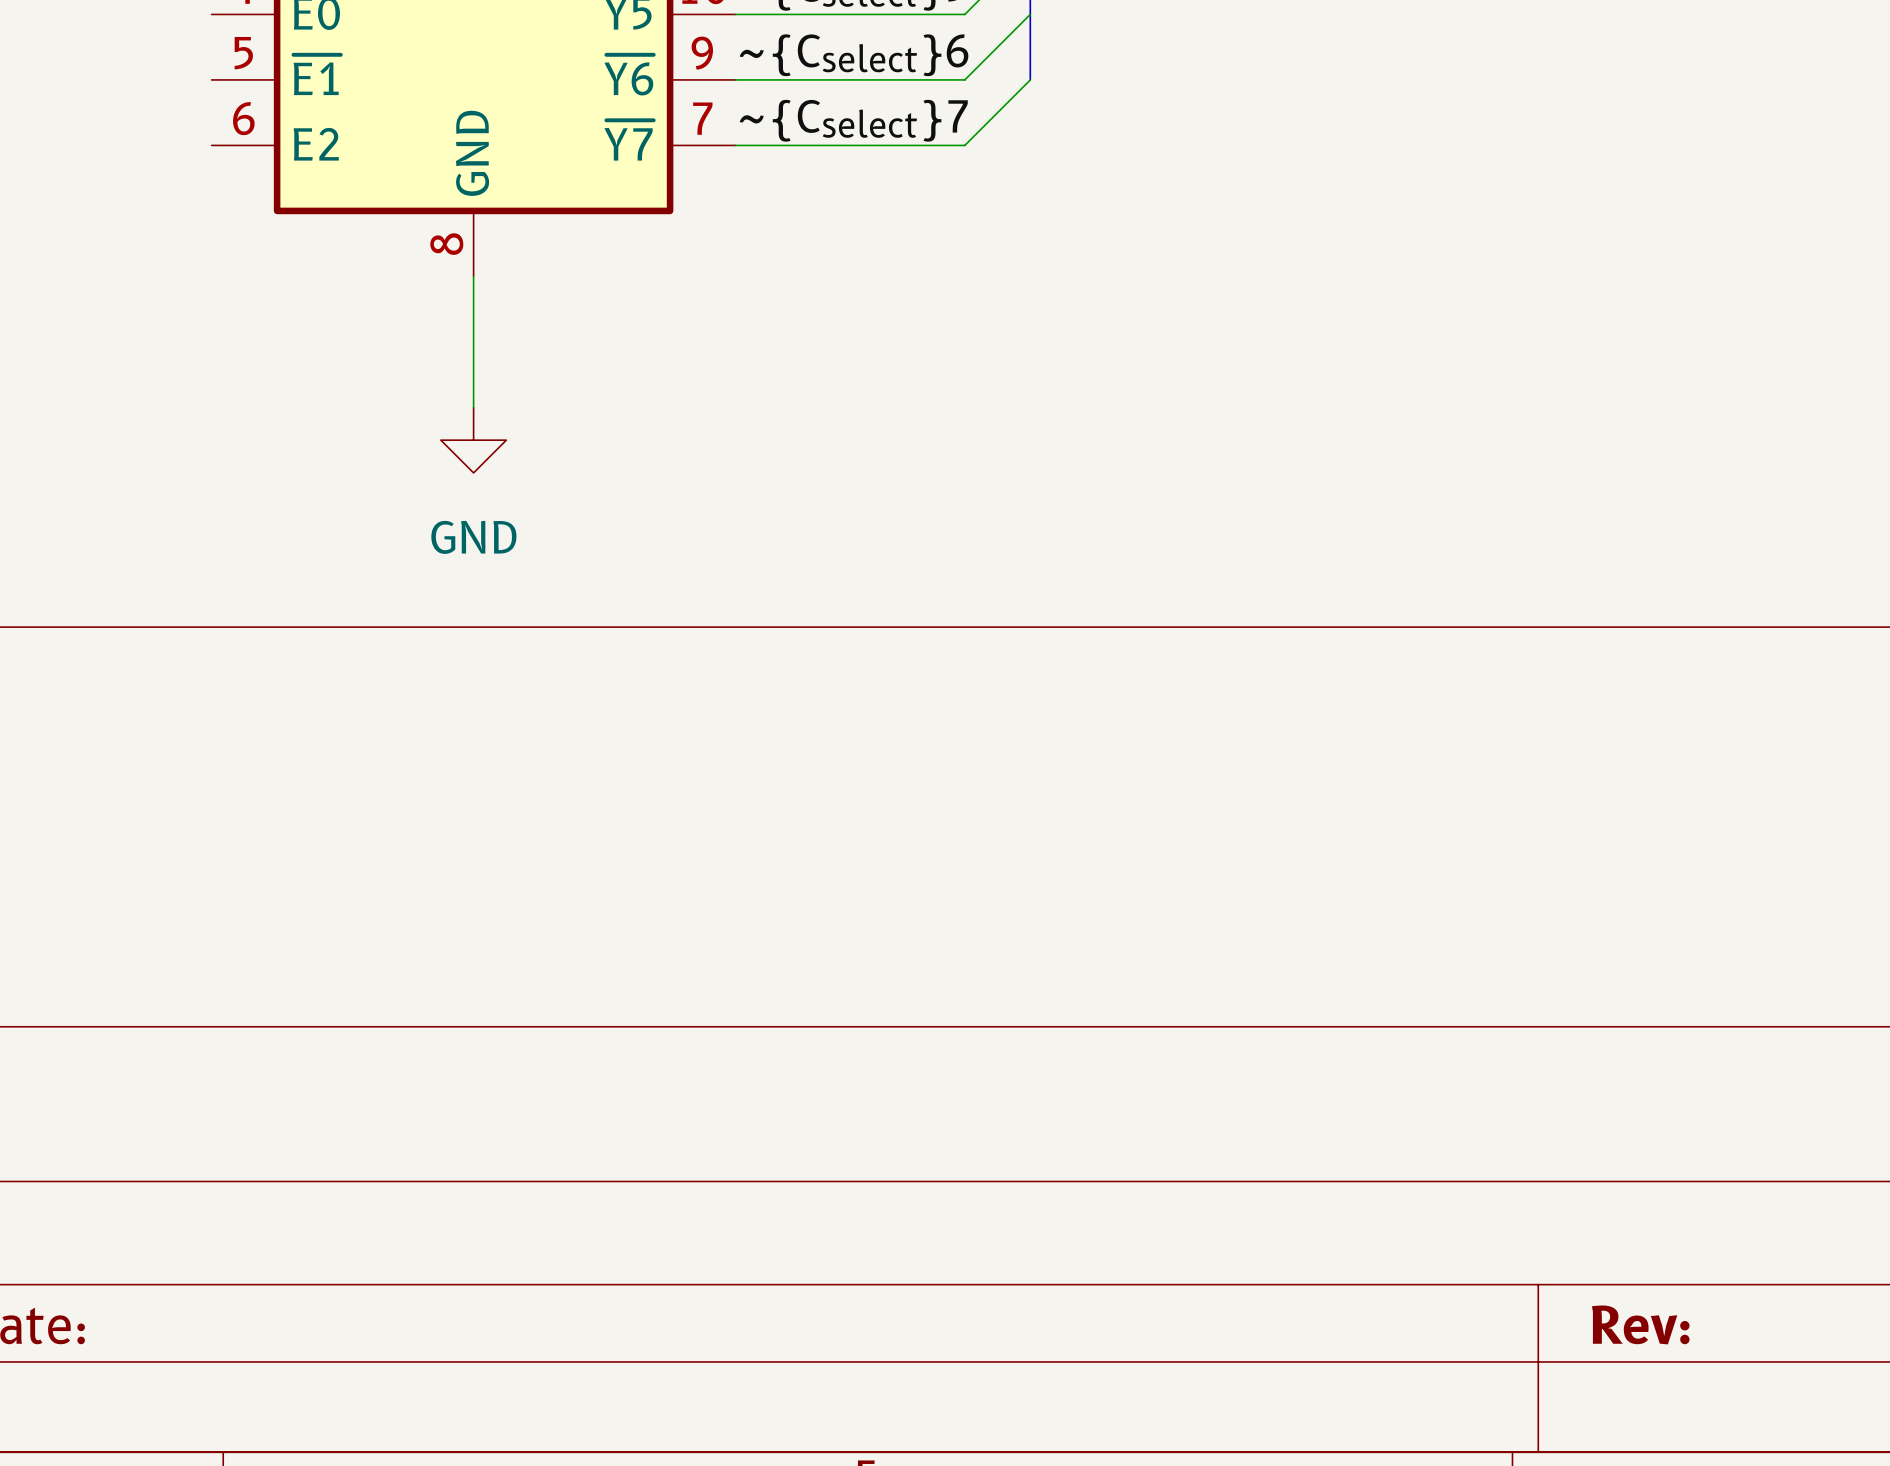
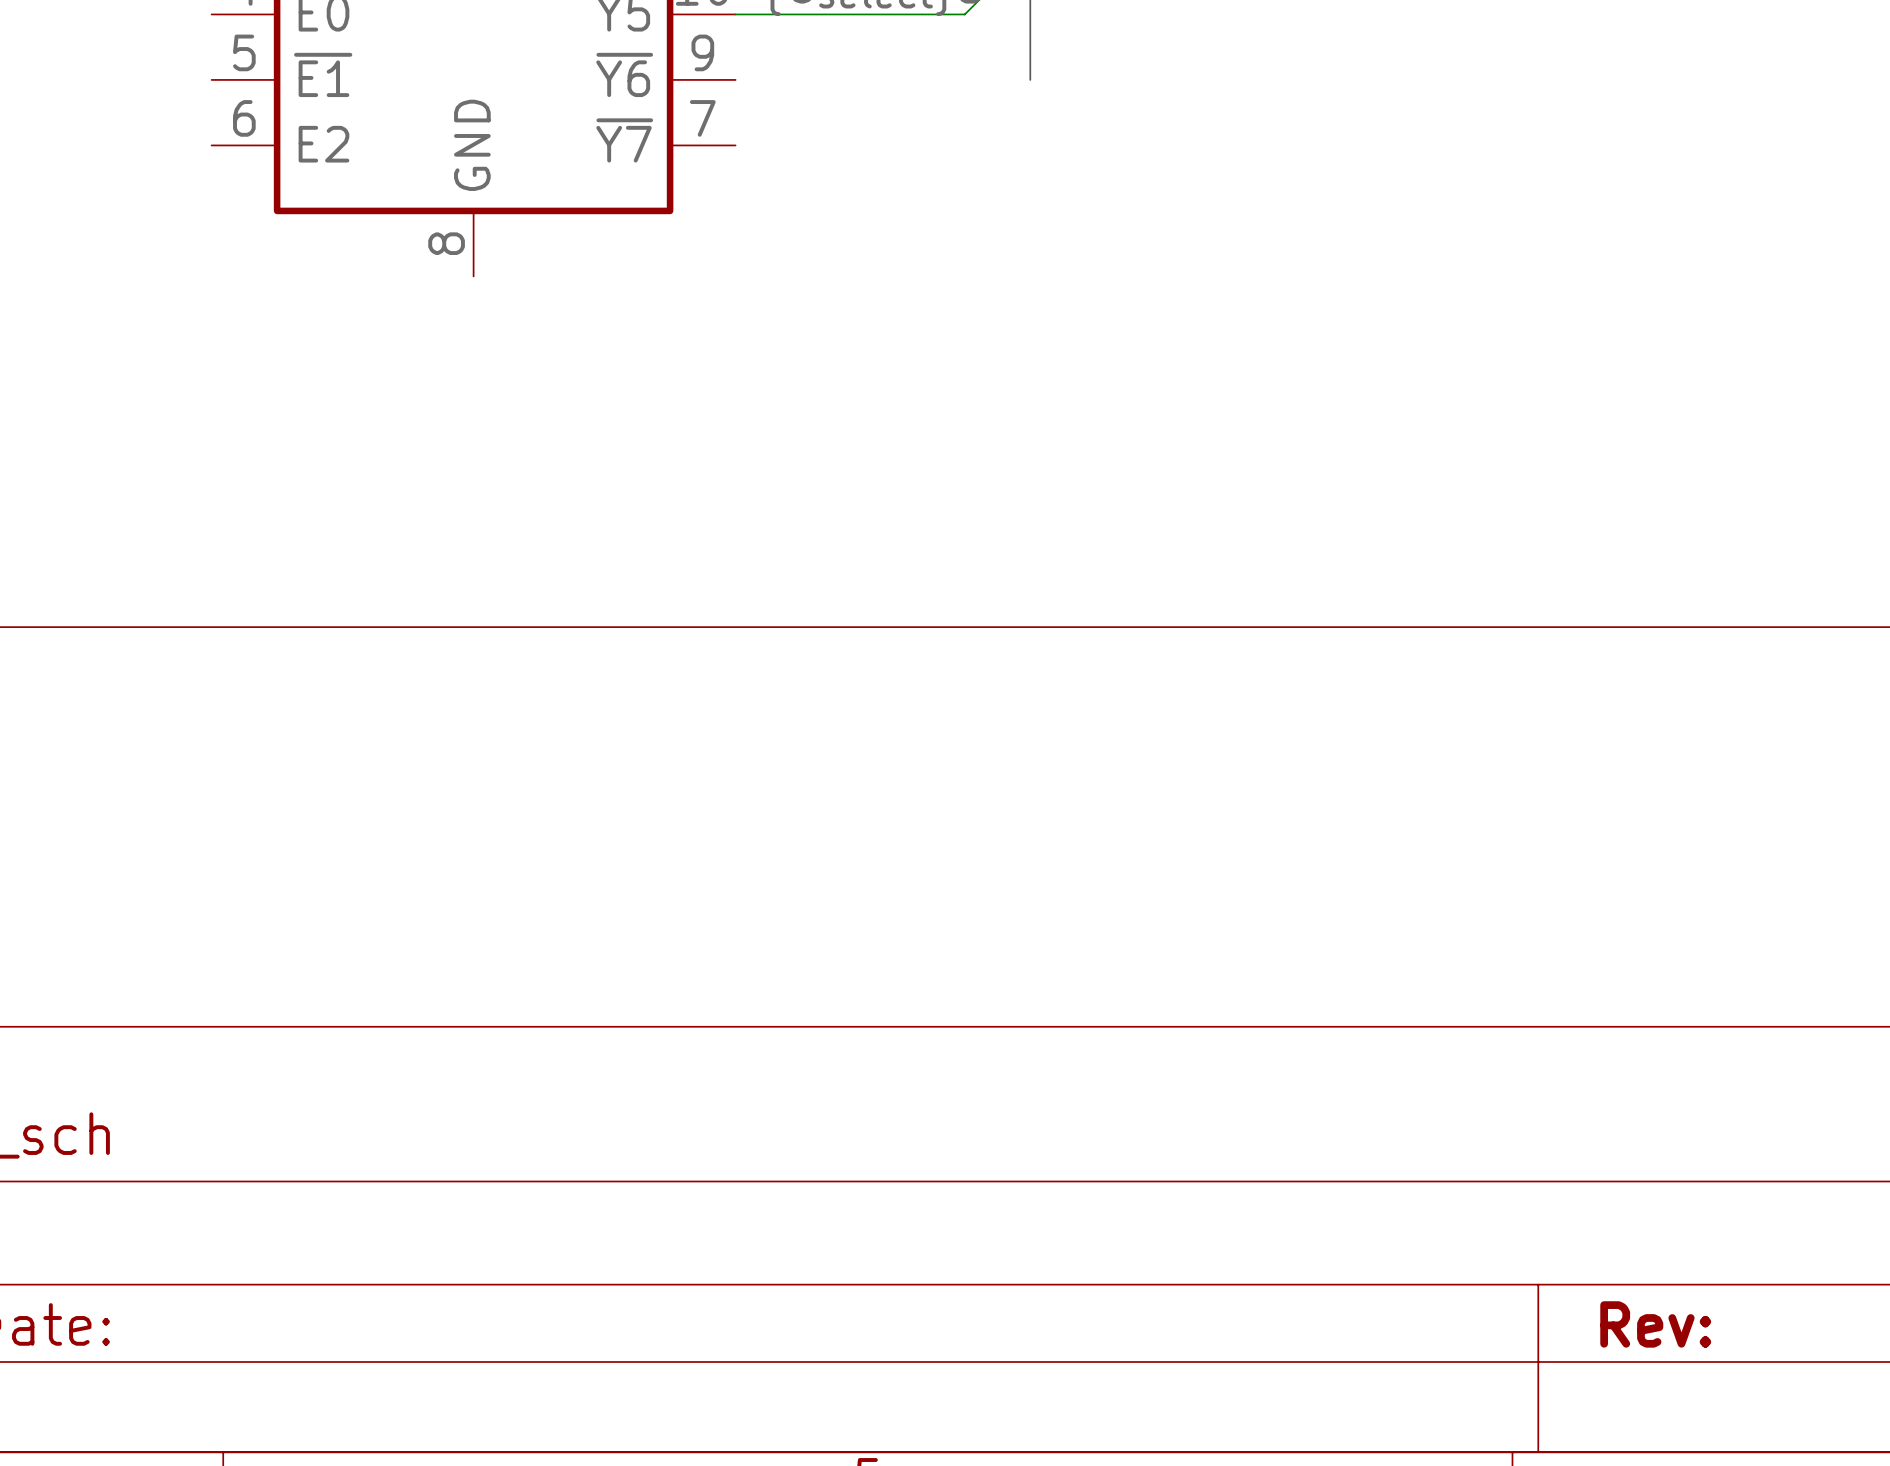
wire: (1030, 14) (964, 79) (735, 79) -> none
label: ~{Cselect}6 (854, 55) -> none
wire: (1030, 79) (964, 145) (735, 145) -> none
label: ~{Cselect}7 (853, 120) -> none
wire: (473, 276) (473, 407) -> none
power symbol: GND (473, 440) -> none

